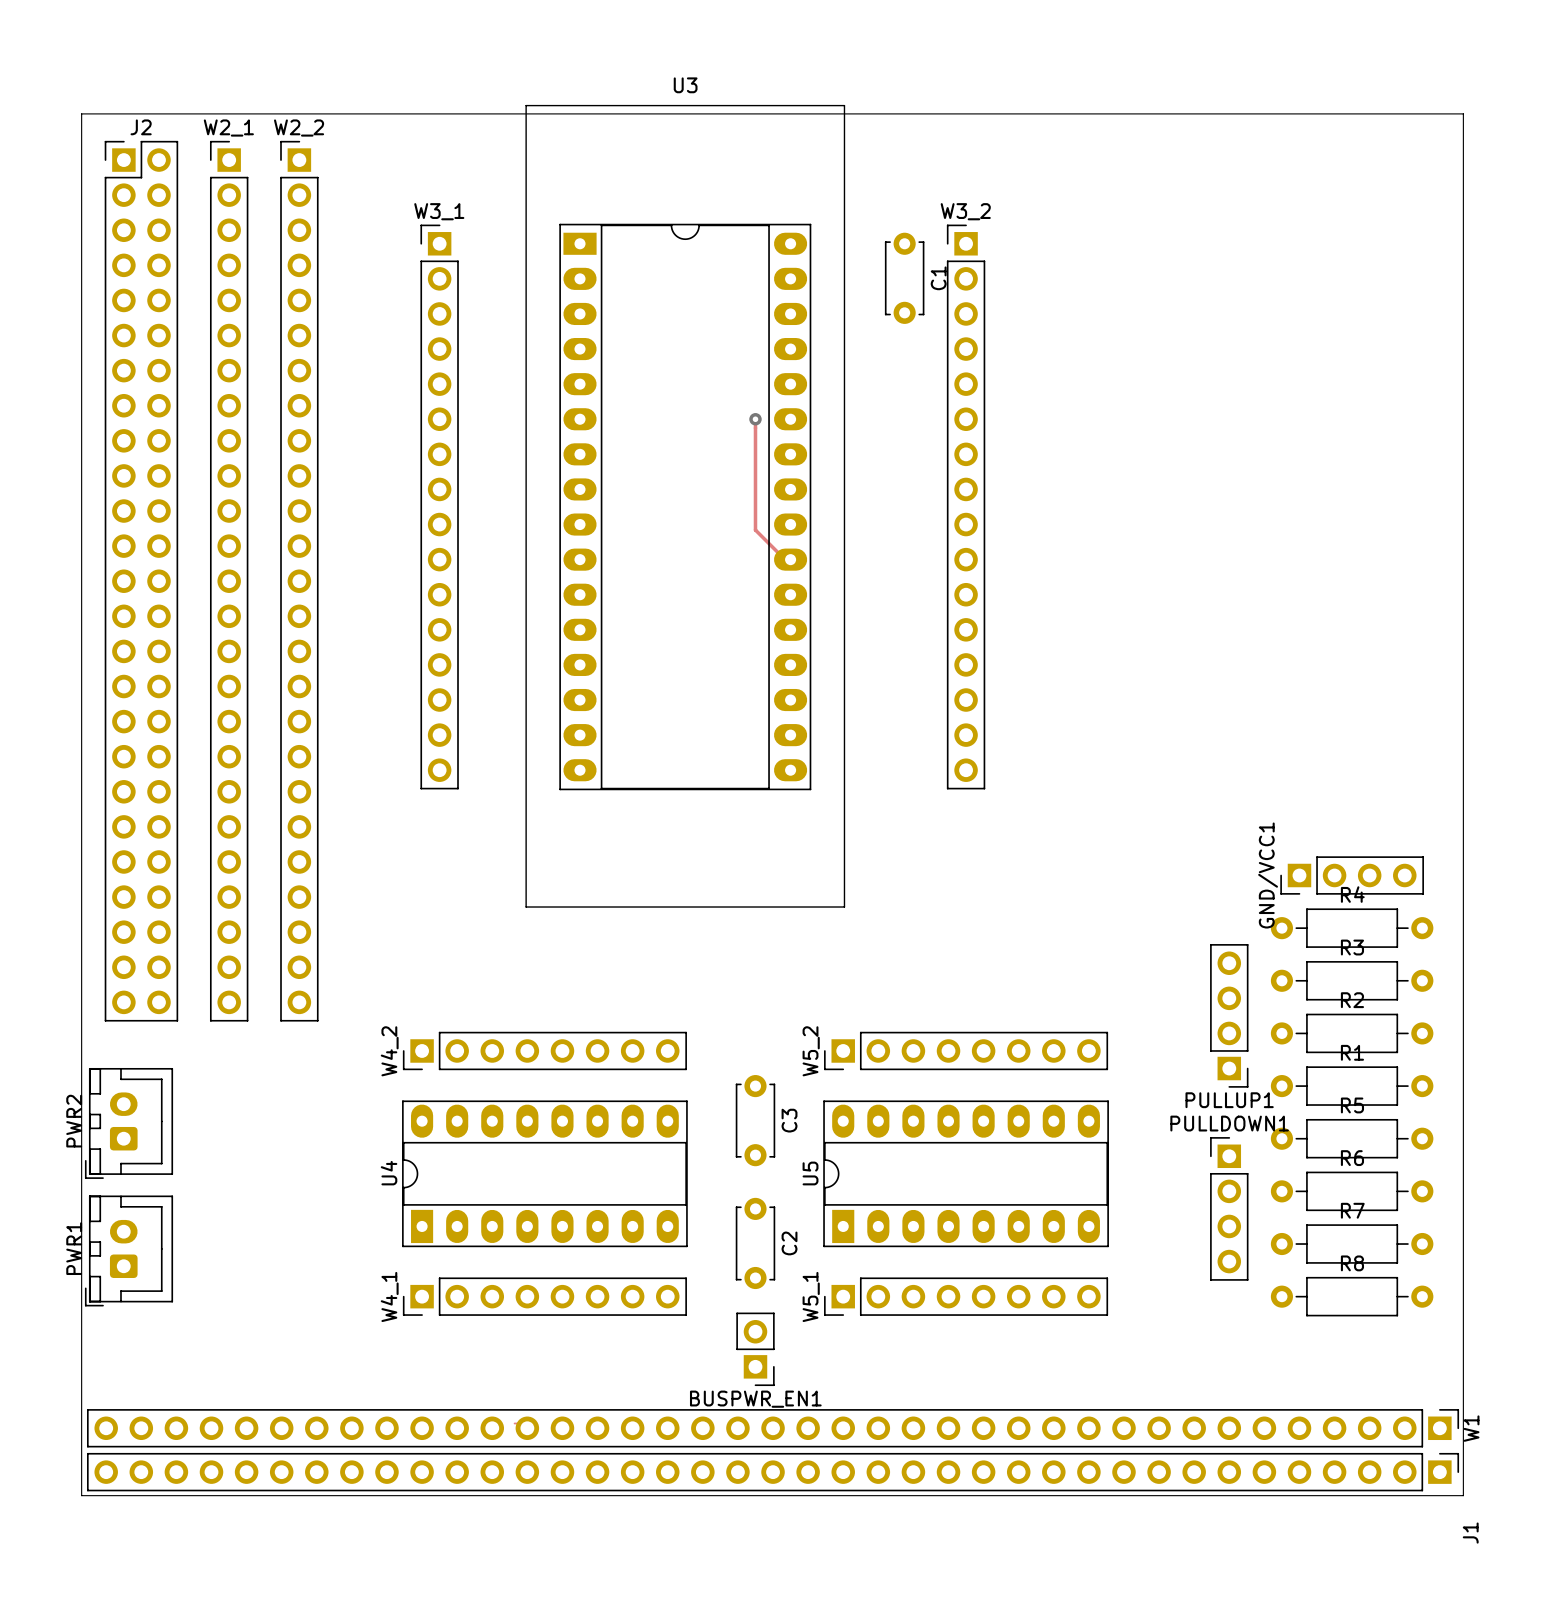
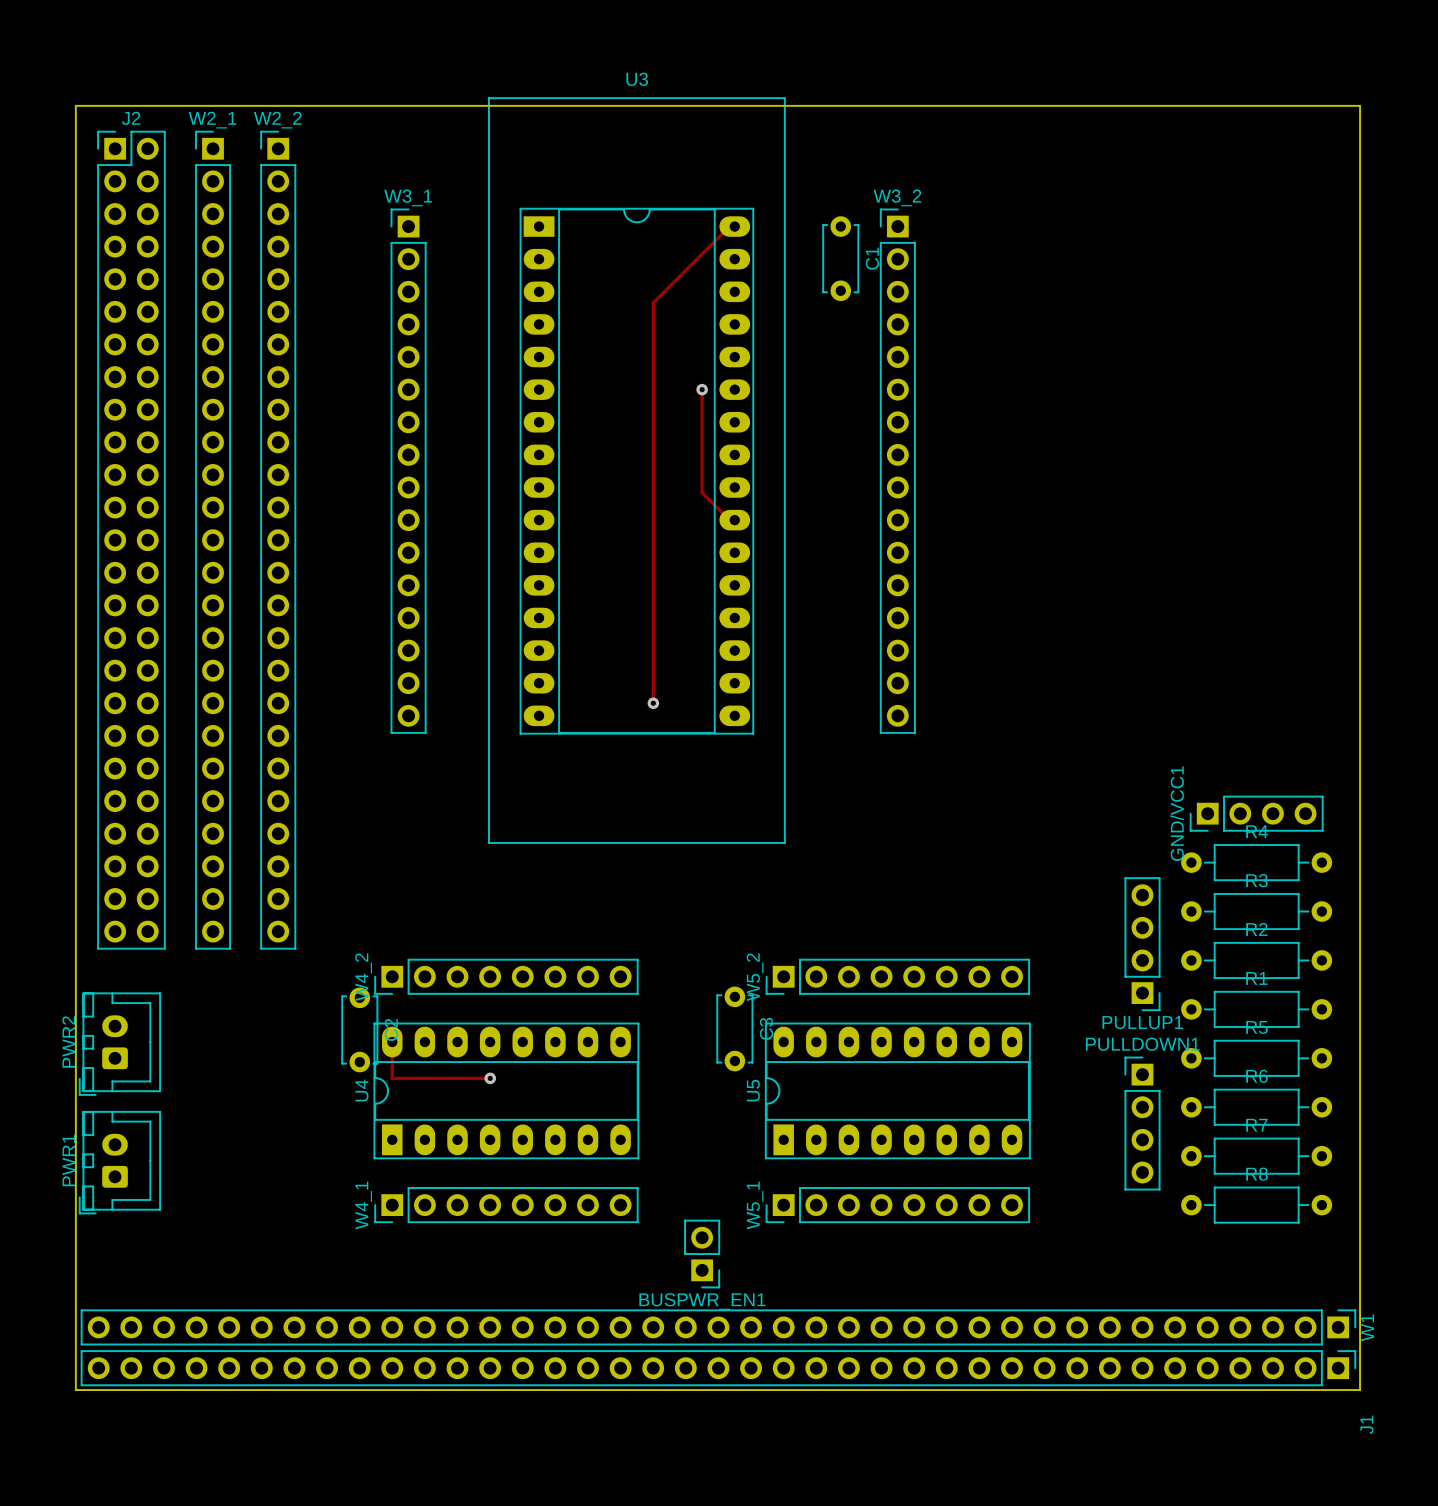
track: none -> (734, 226) (729, 226) (653, 302) (653, 703)
via: none -> (653, 703)
C3 position: (755, 1120) -> (734, 1028)
track: none -> (392, 1042) (392, 1078)
track: none -> (392, 1078) (490, 1078)
via: none -> (490, 1078)
C2 position: (755, 1243) -> (359, 1029)

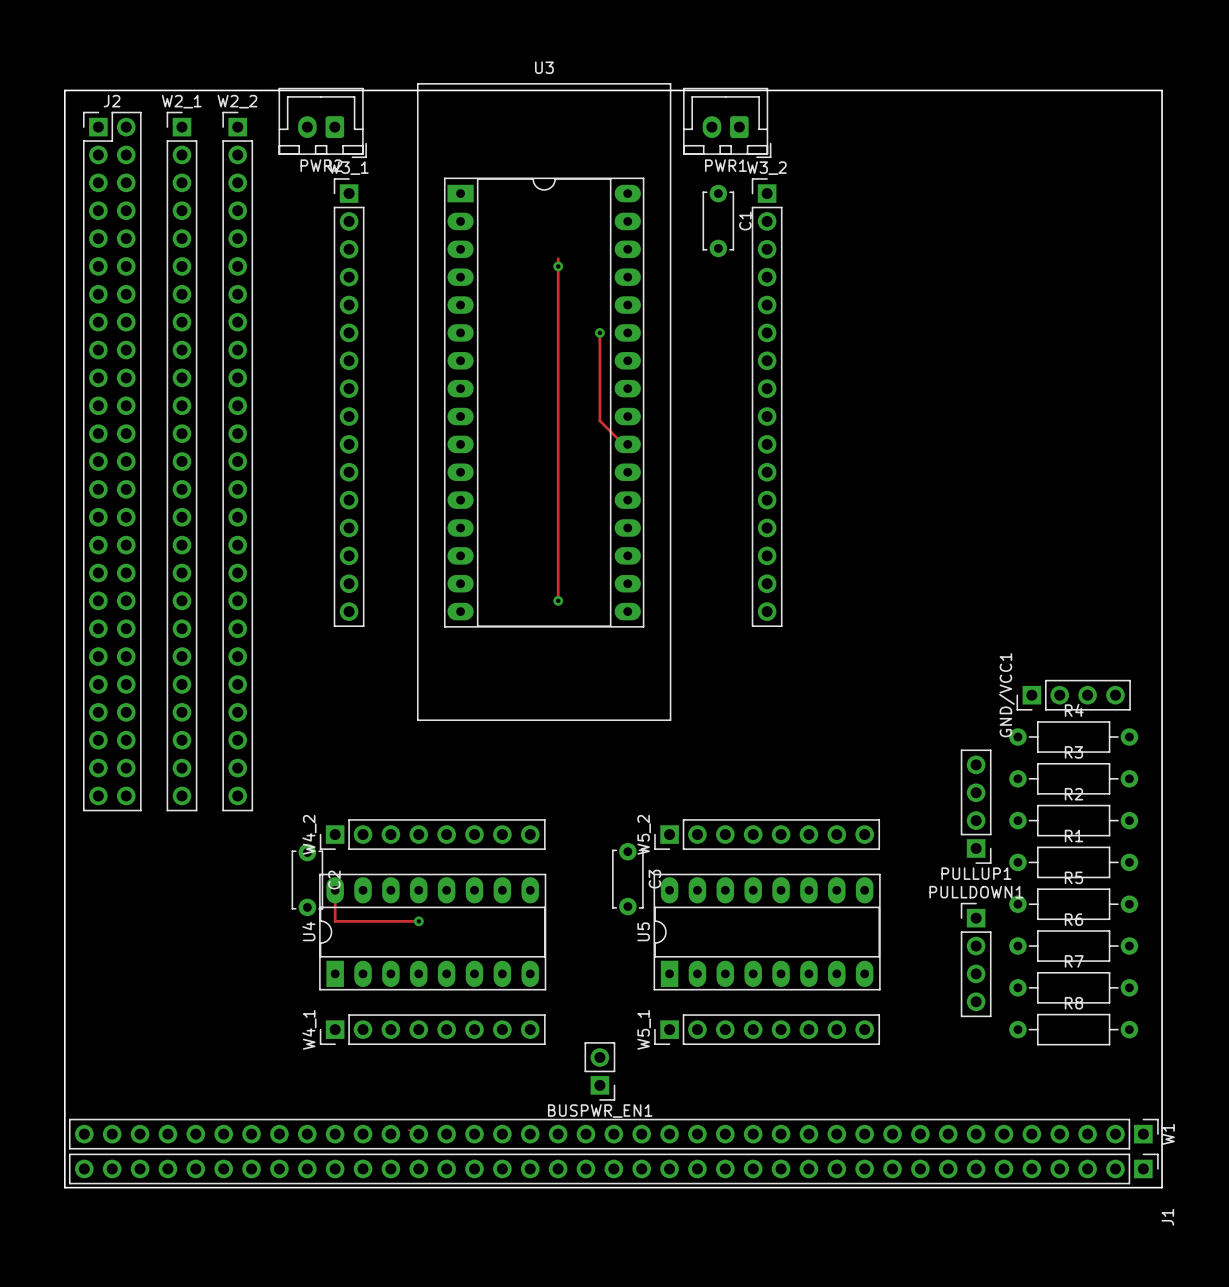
track: (729, 226) (653, 302) -> none
via: none -> (558, 266)
PWR2 rotation: 0° (119, 1044) -> 90° counterclockwise (322, 122)
PWR2 position: (119, 1044) -> (322, 122)
PWR1 rotation: 0° (119, 1162) -> 90° counterclockwise (727, 122)
PWR1 position: (119, 1162) -> (727, 122)

